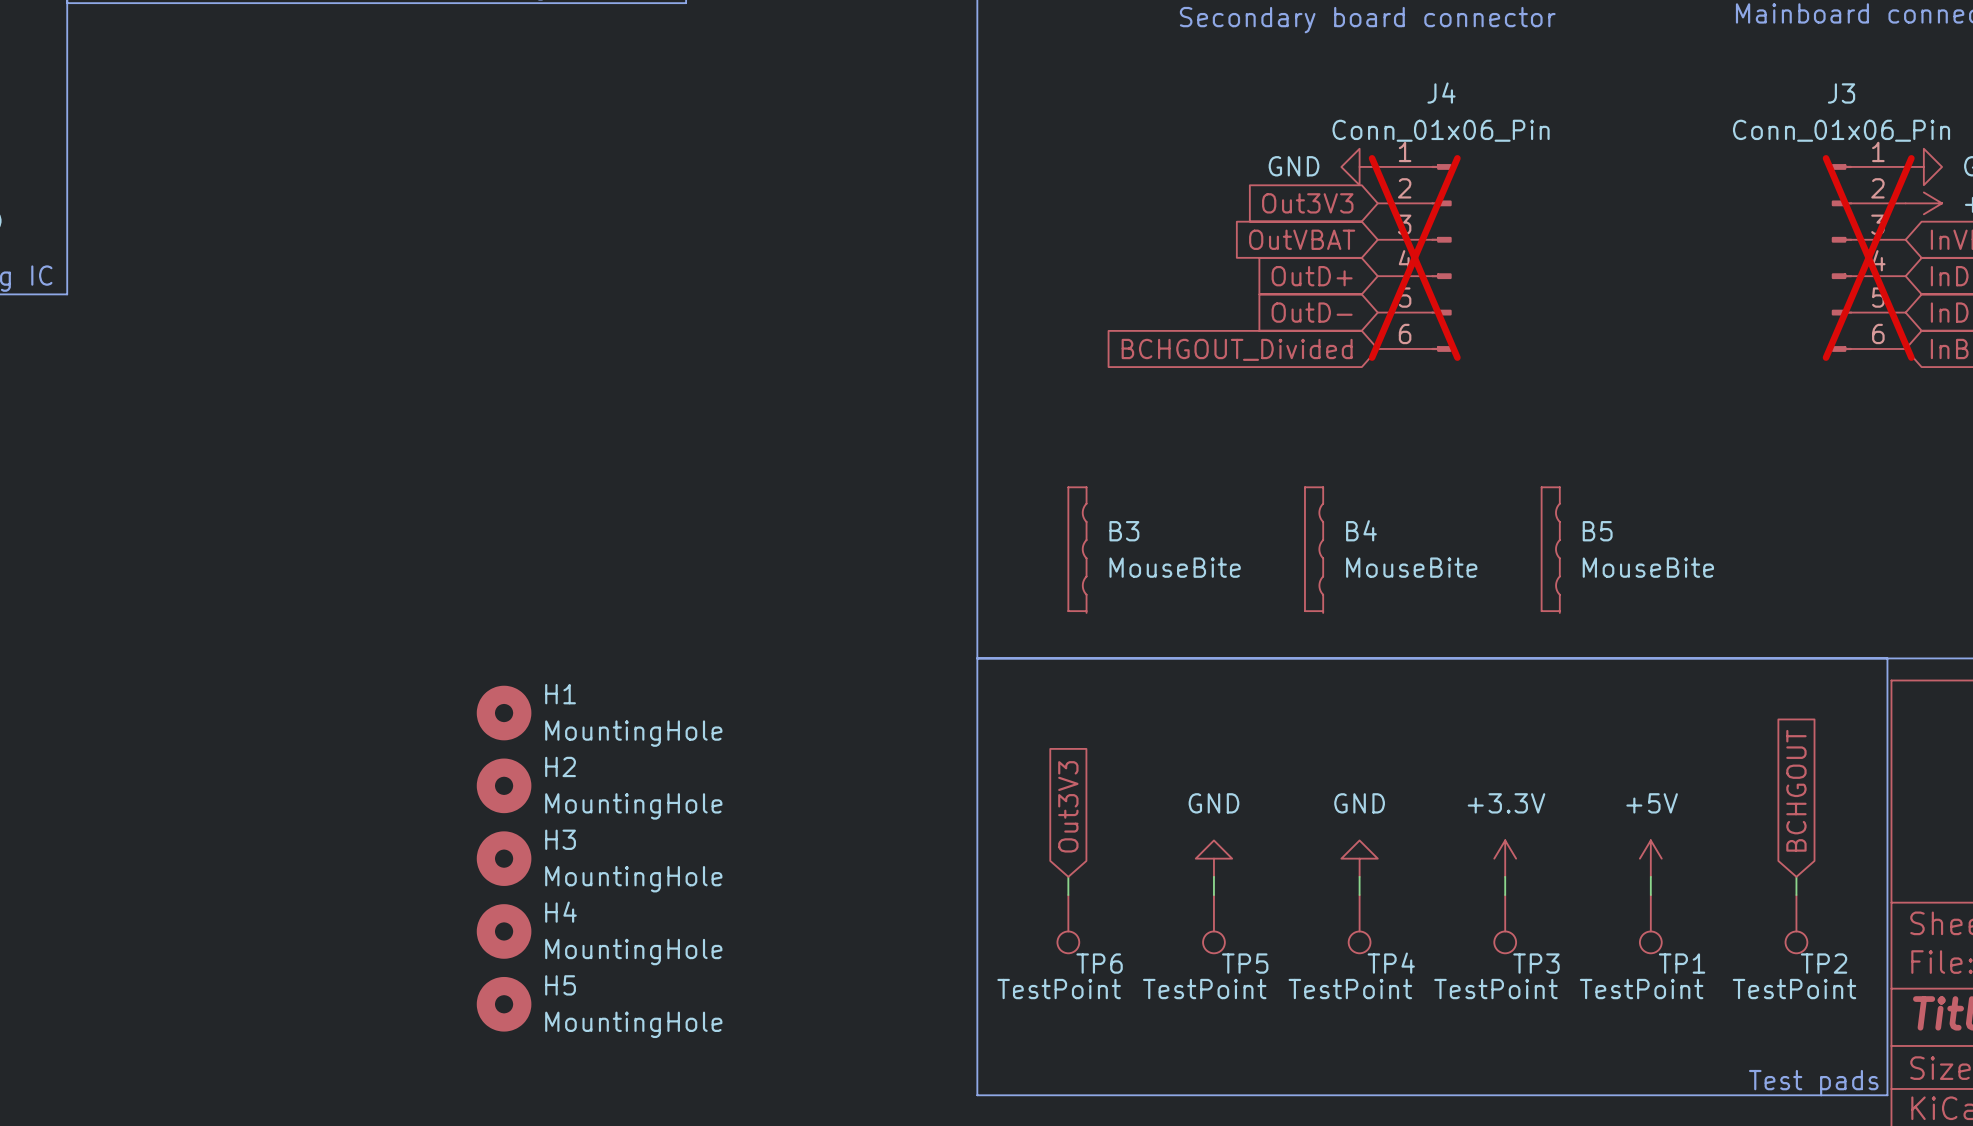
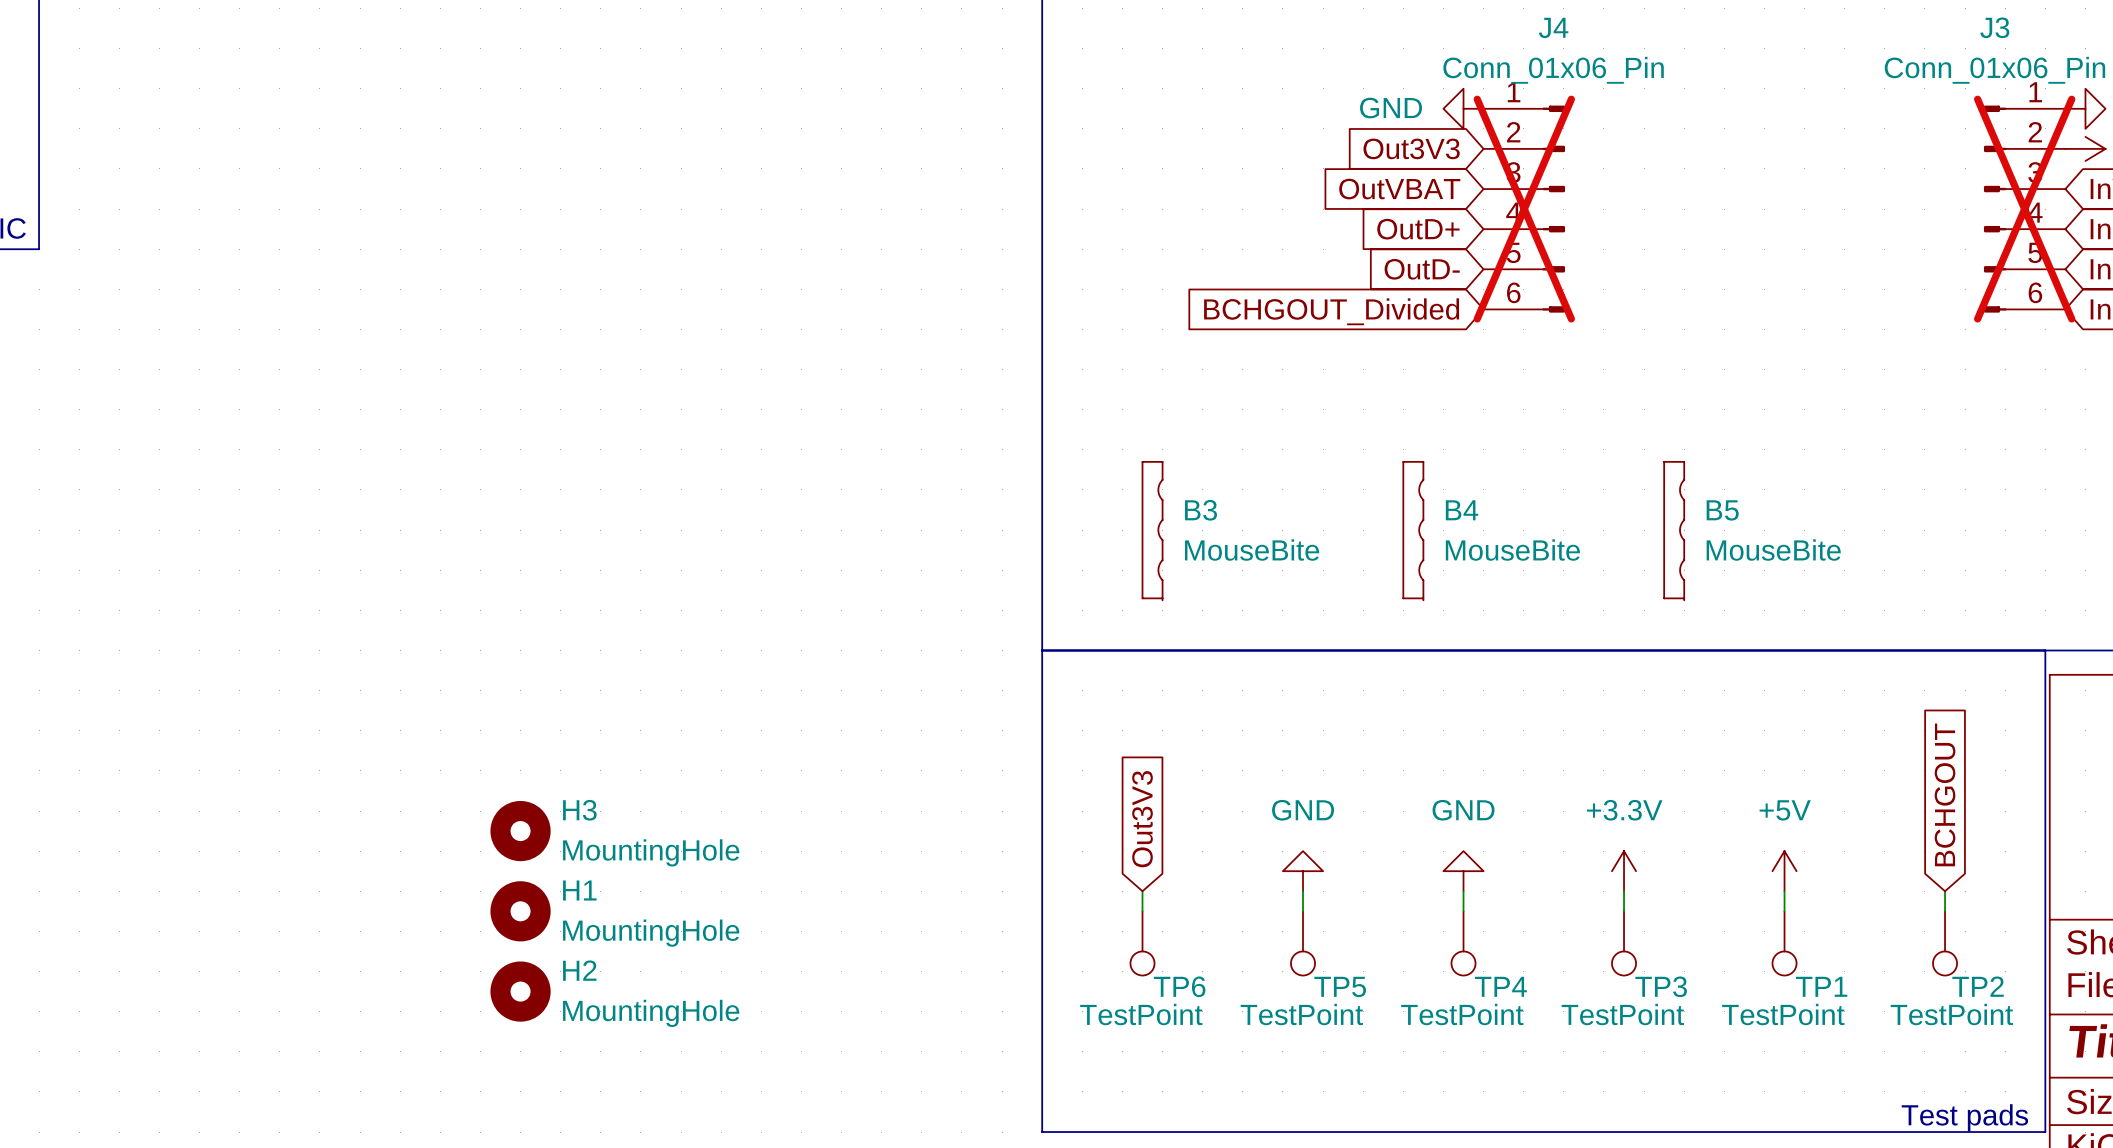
H1 position: (504, 713) -> (520, 911)
H2 position: (504, 785) -> (520, 991)
H3 position: (504, 858) -> (520, 831)
H4: MountingHole (504, 931) -> none
H5: MountingHole (504, 1004) -> none

